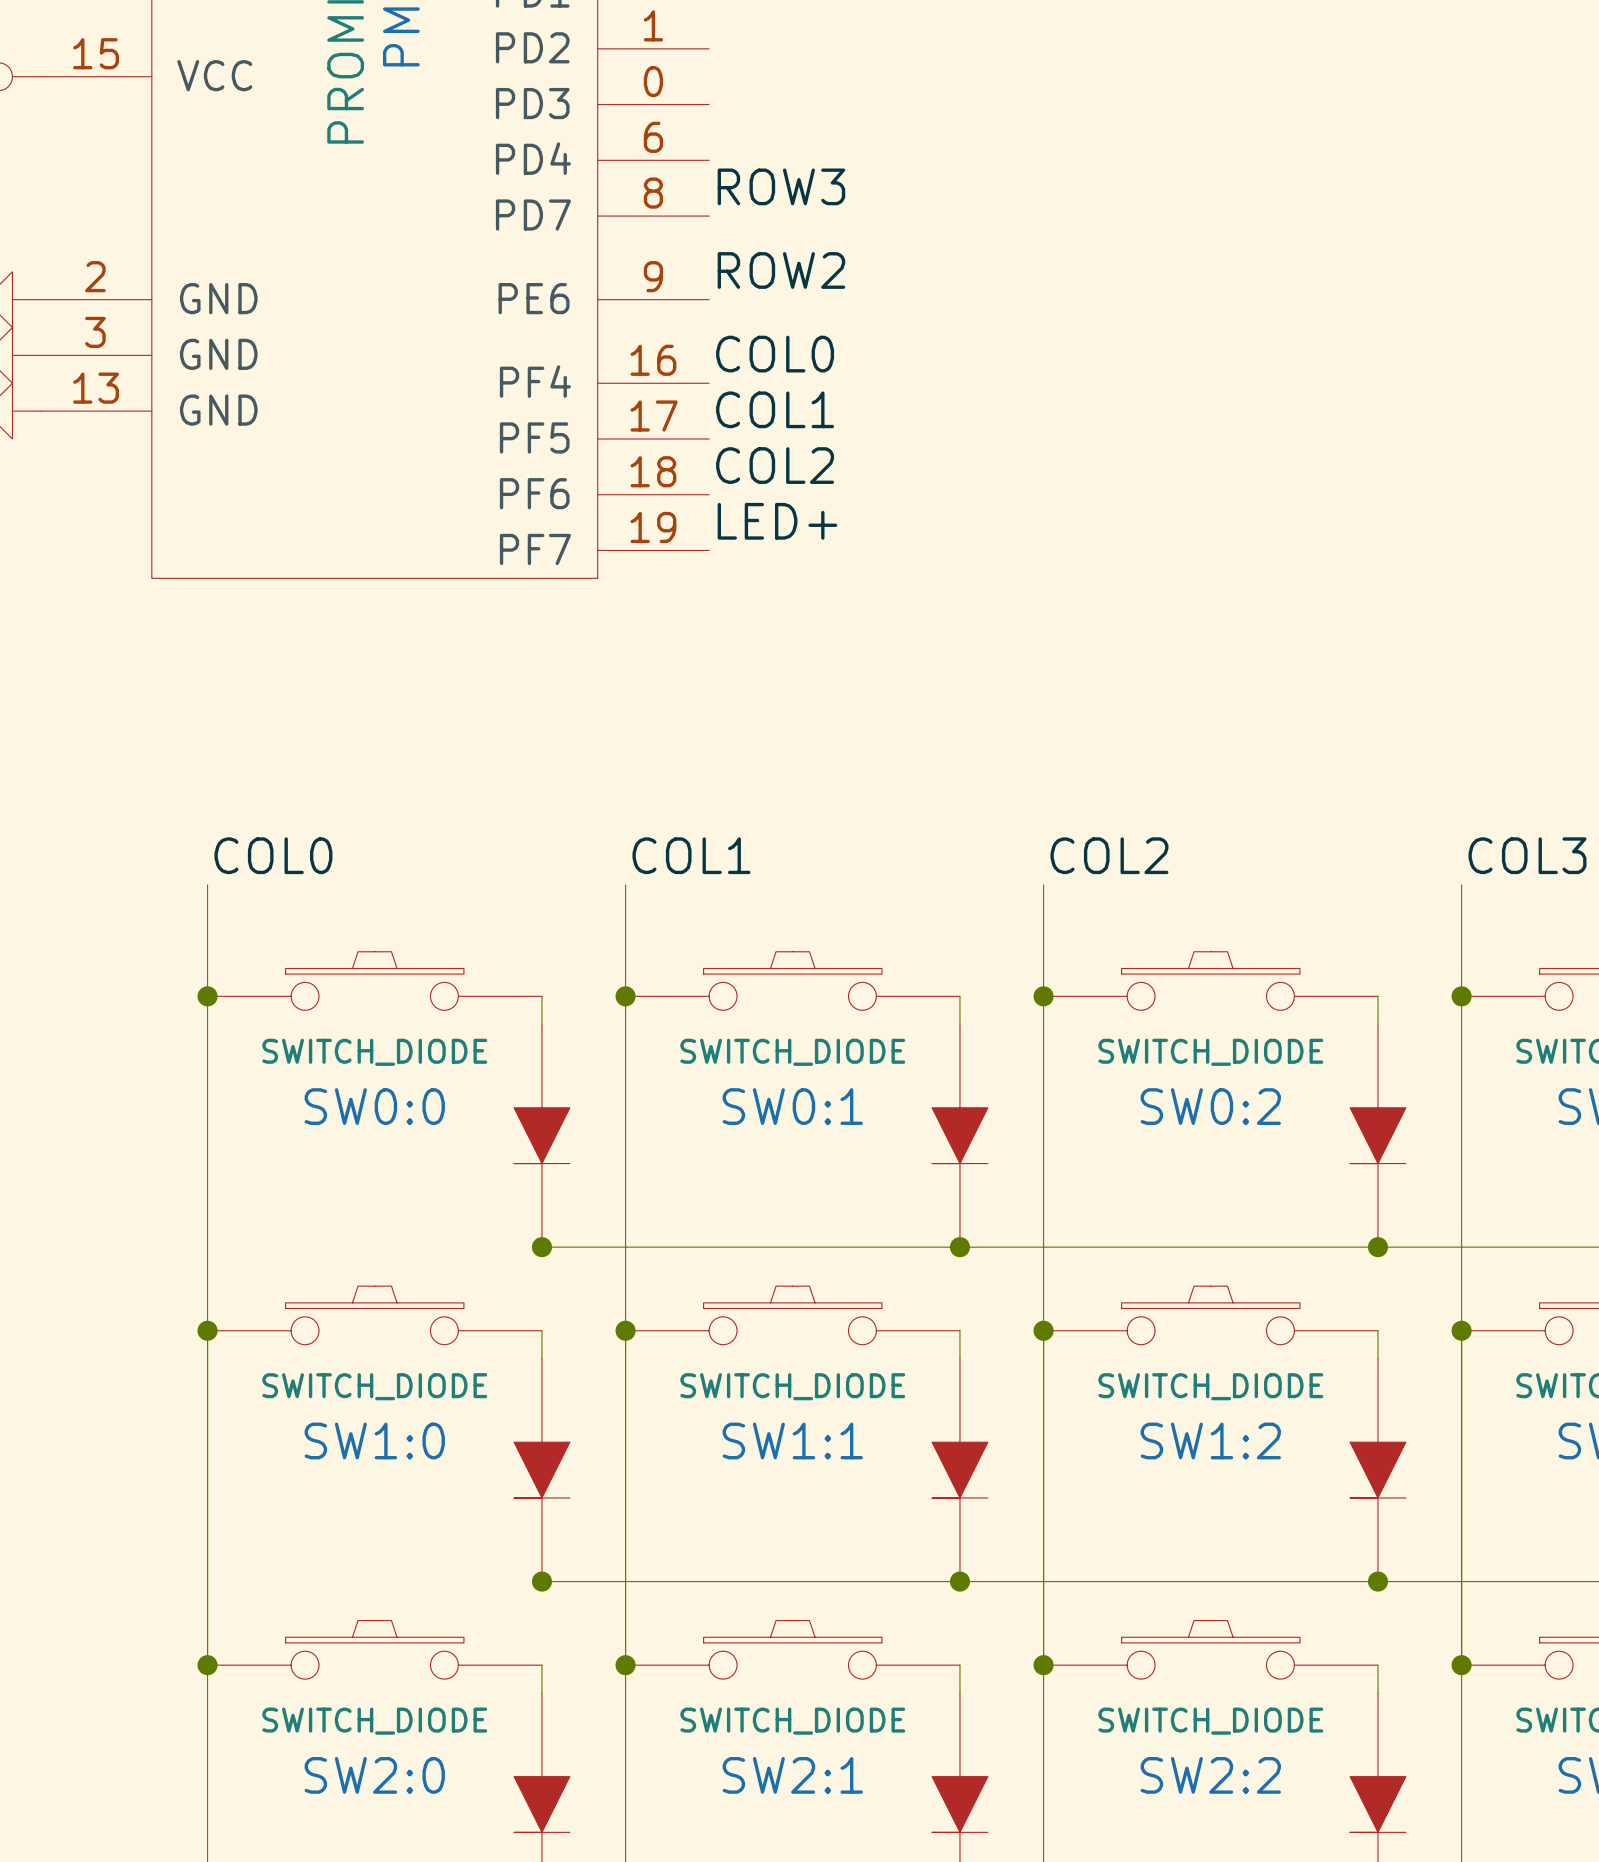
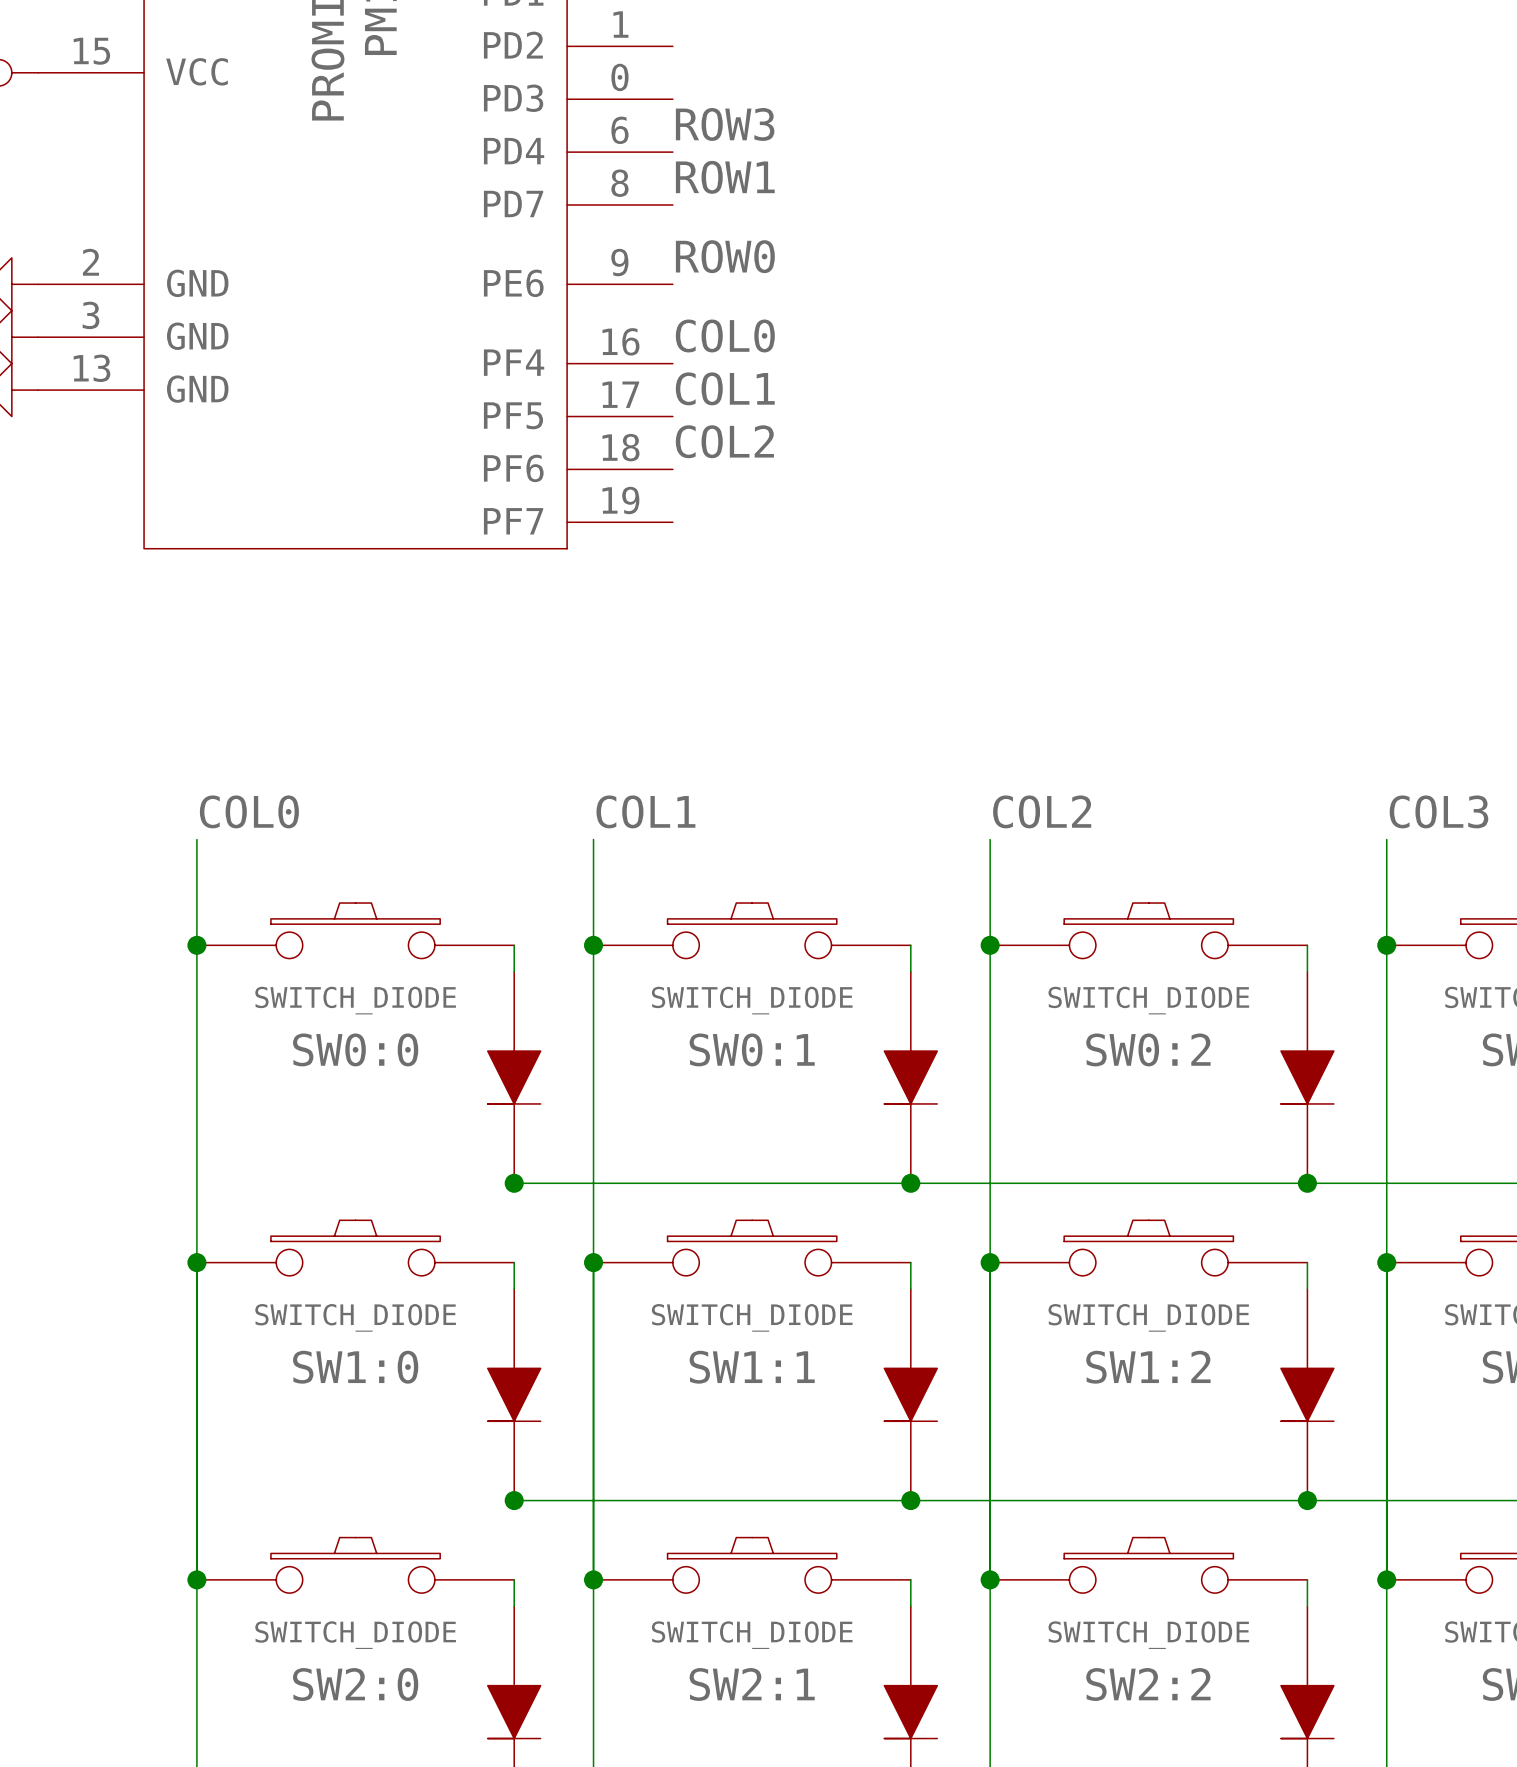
label: none -> ROW3 (725, 124)
label: ROW3 (781, 186) -> ROW1 (725, 177)
label: ROW2 (781, 270) -> ROW0 (725, 256)
label: LED+ (777, 521) -> none

